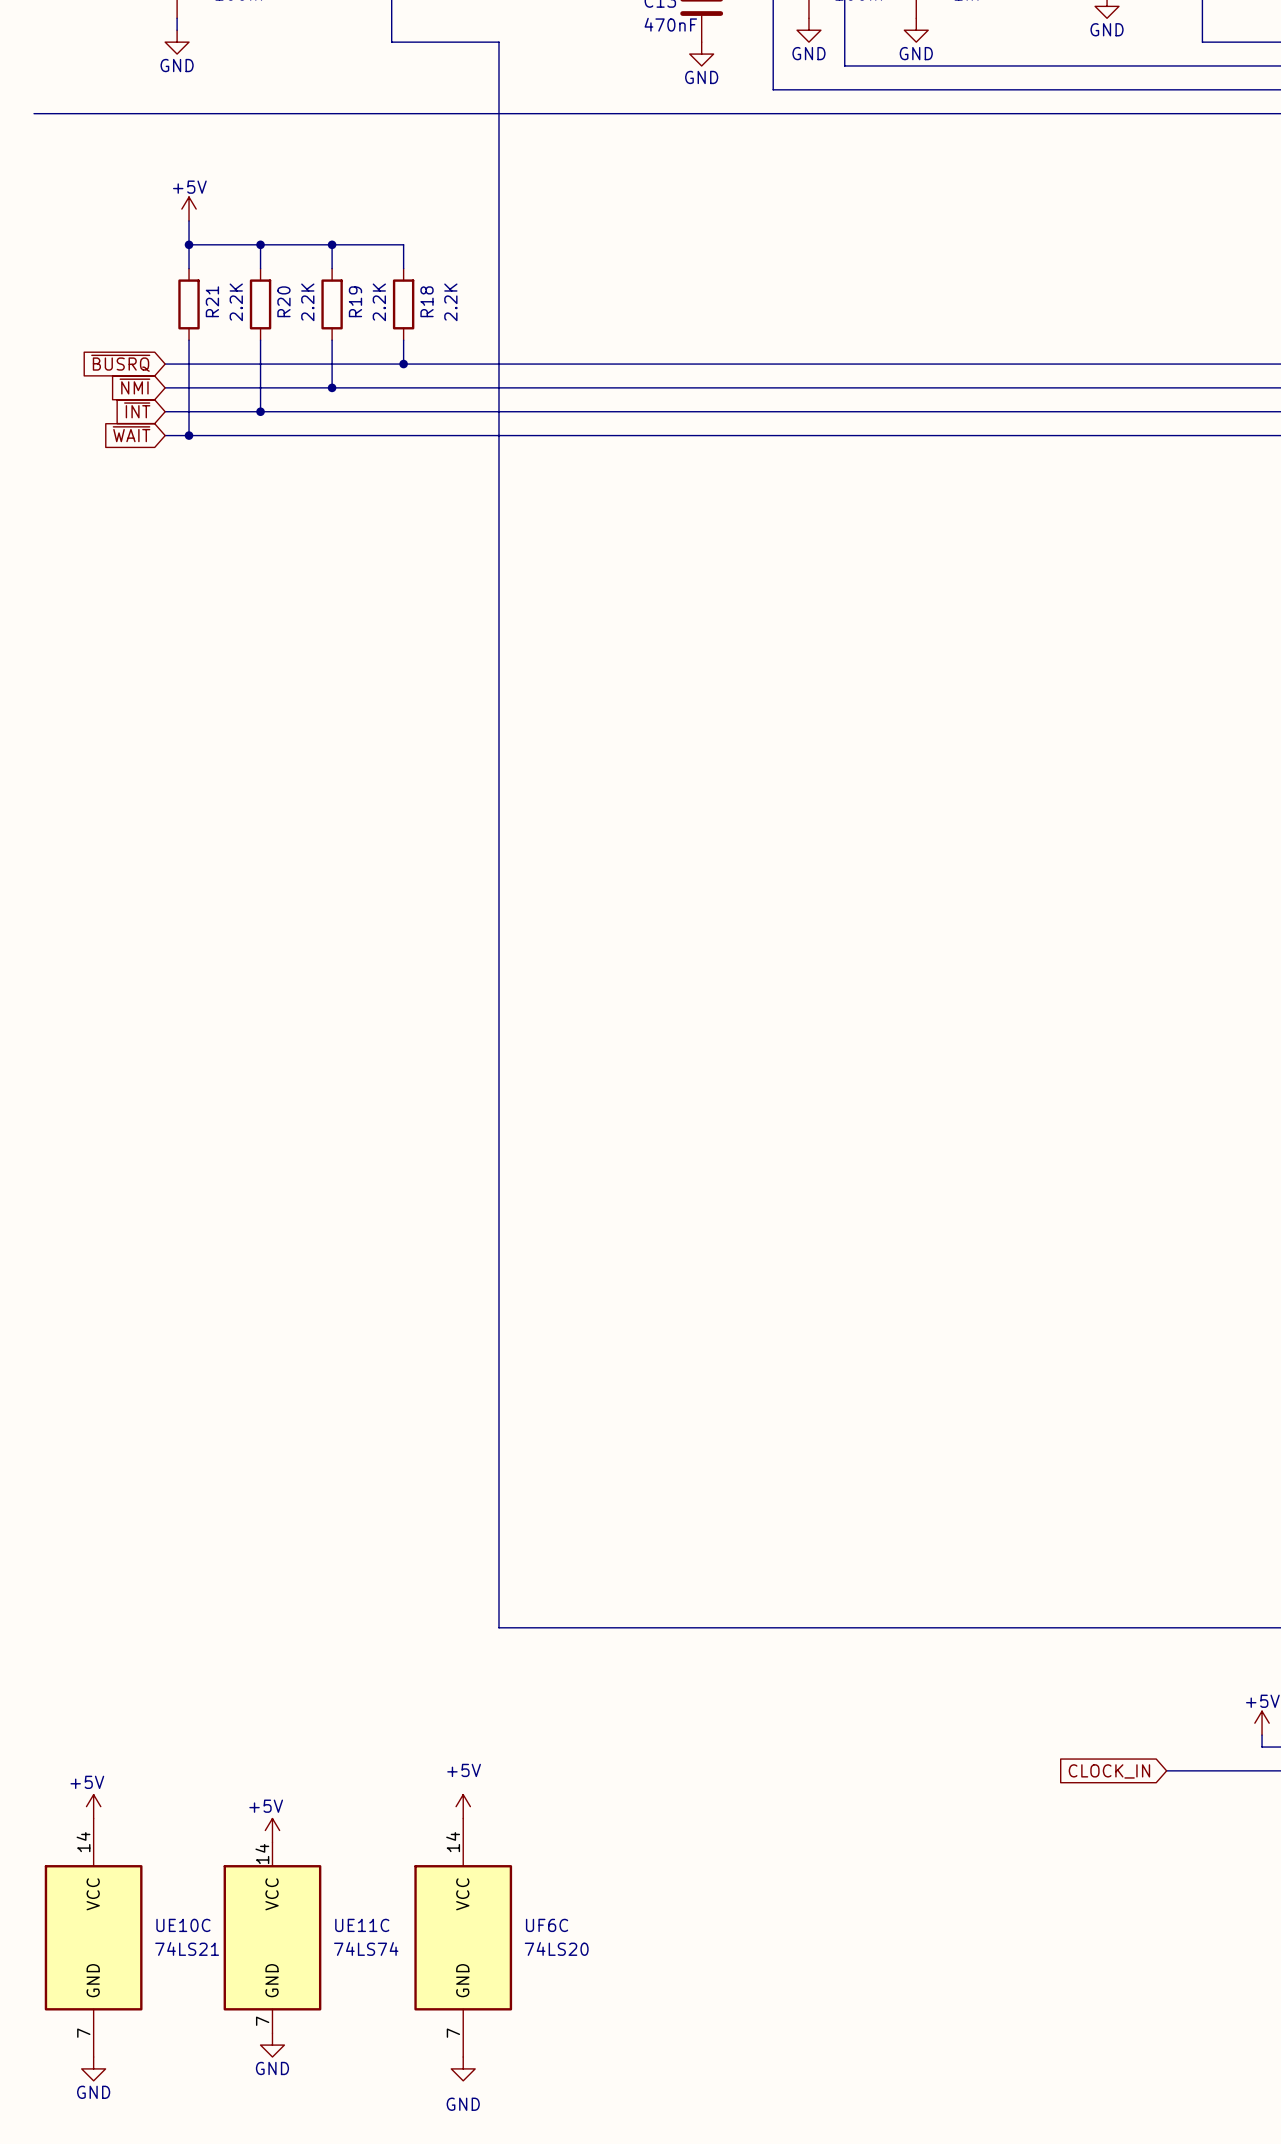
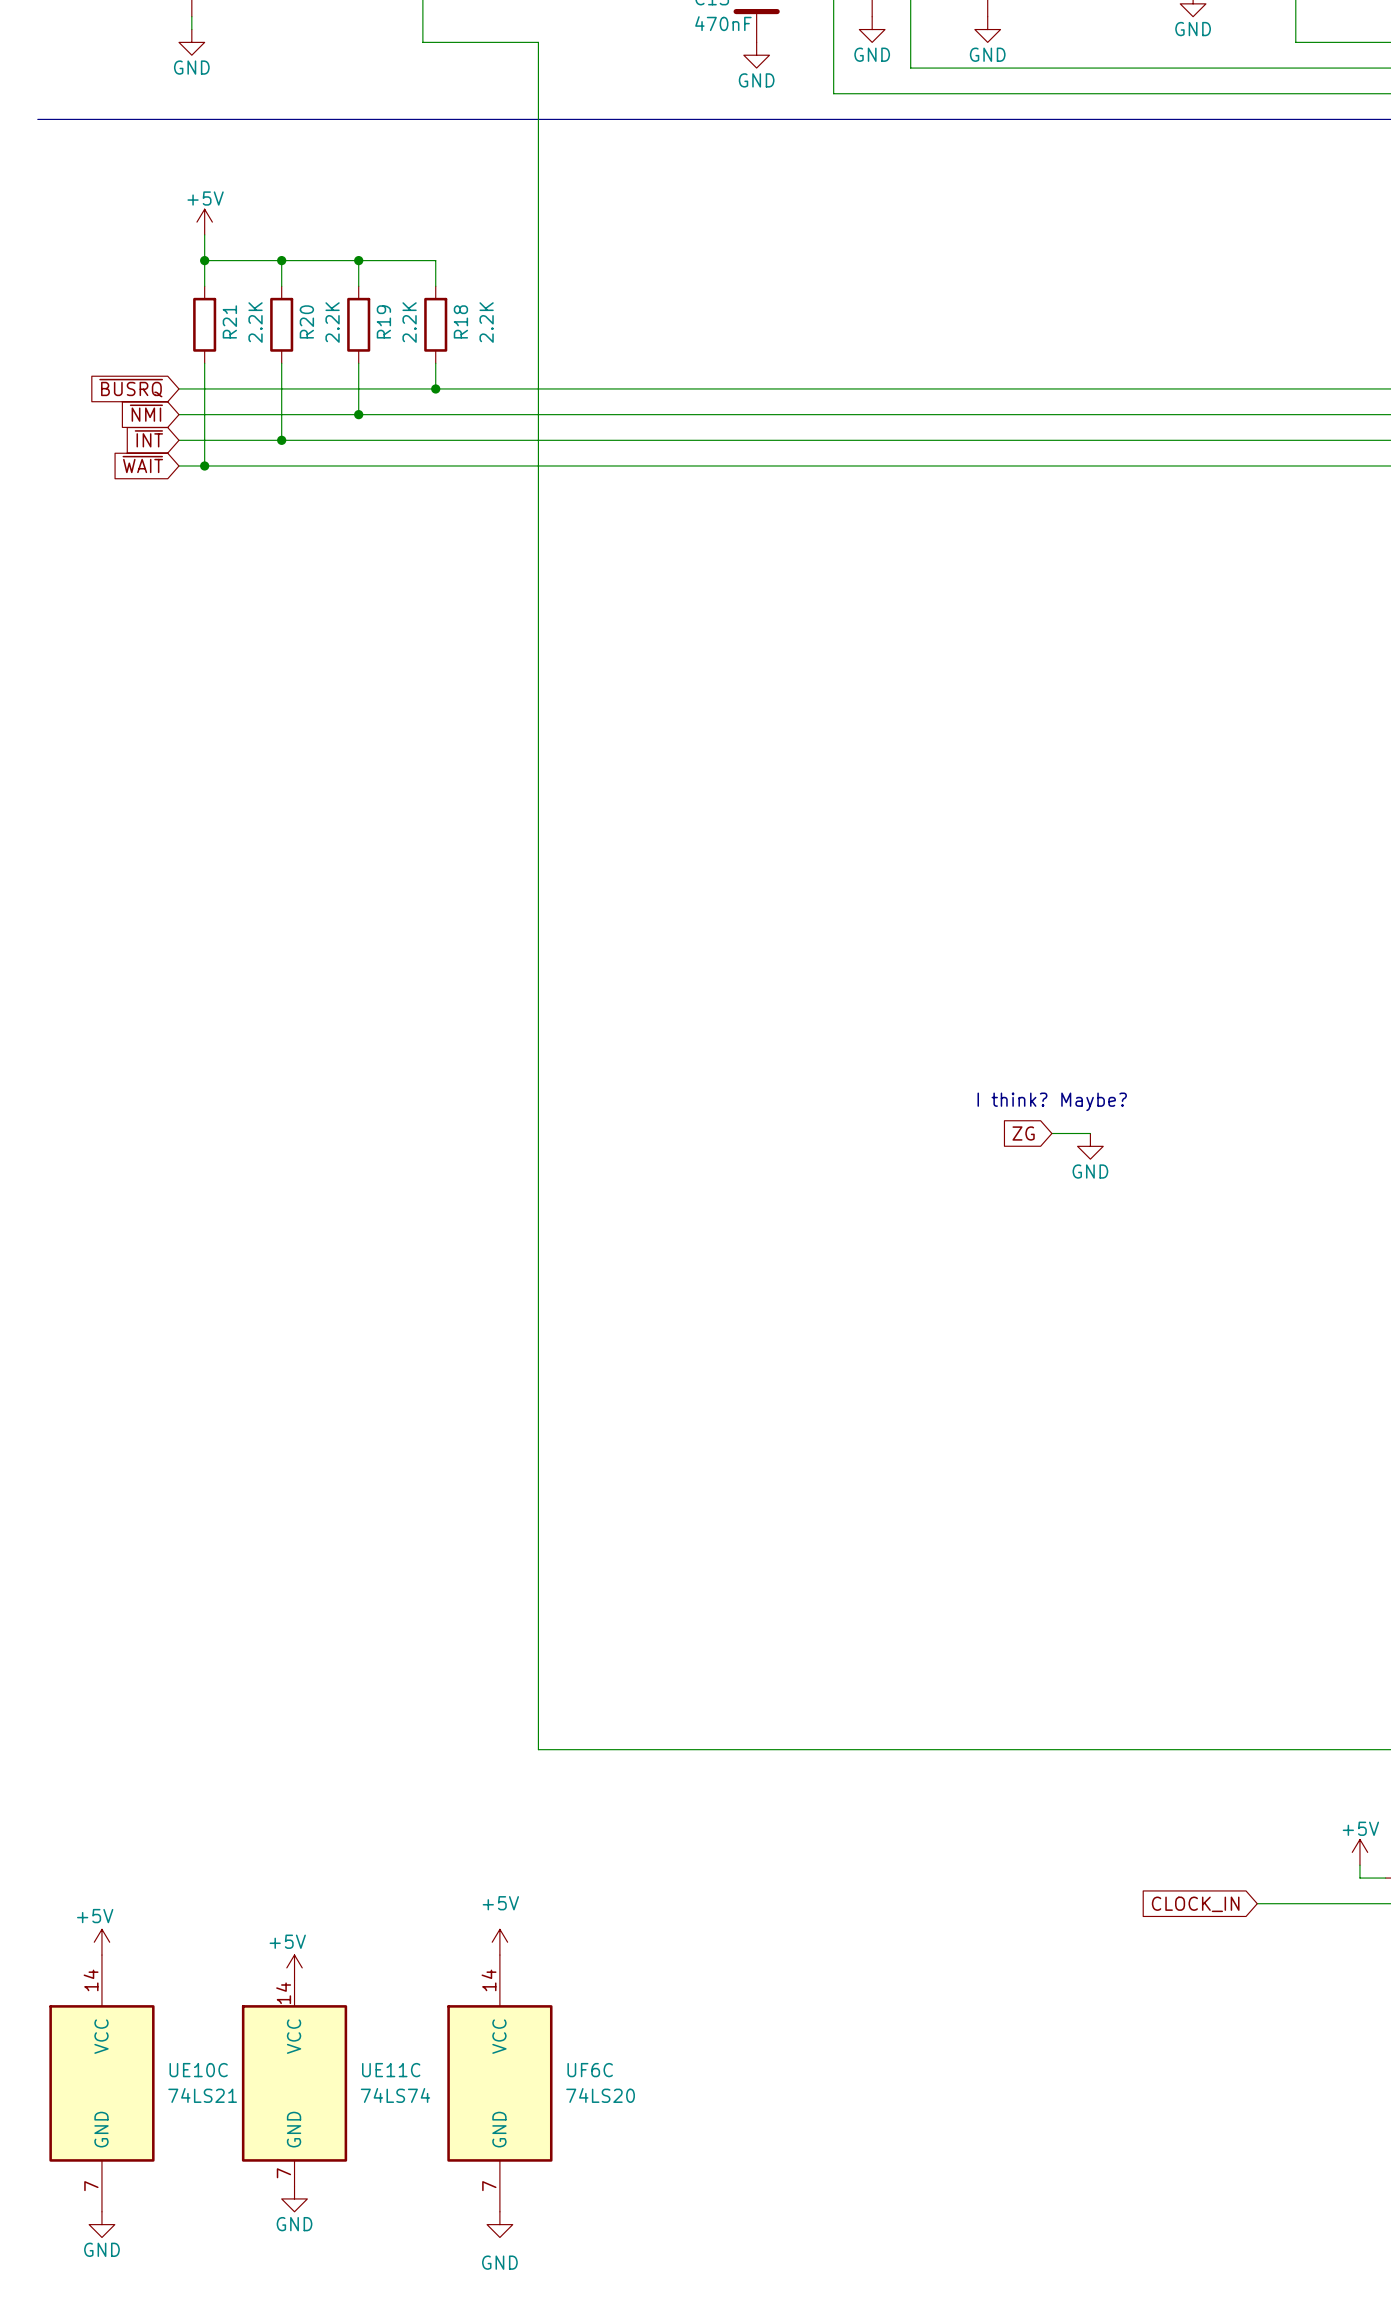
text: none -> I think? Maybe? (1052, 1101)
global label: none -> ZG (1023, 1133)
wire: none -> (1051, 1133) (1090, 1133)
power symbol: none -> GND (1090, 1146)

